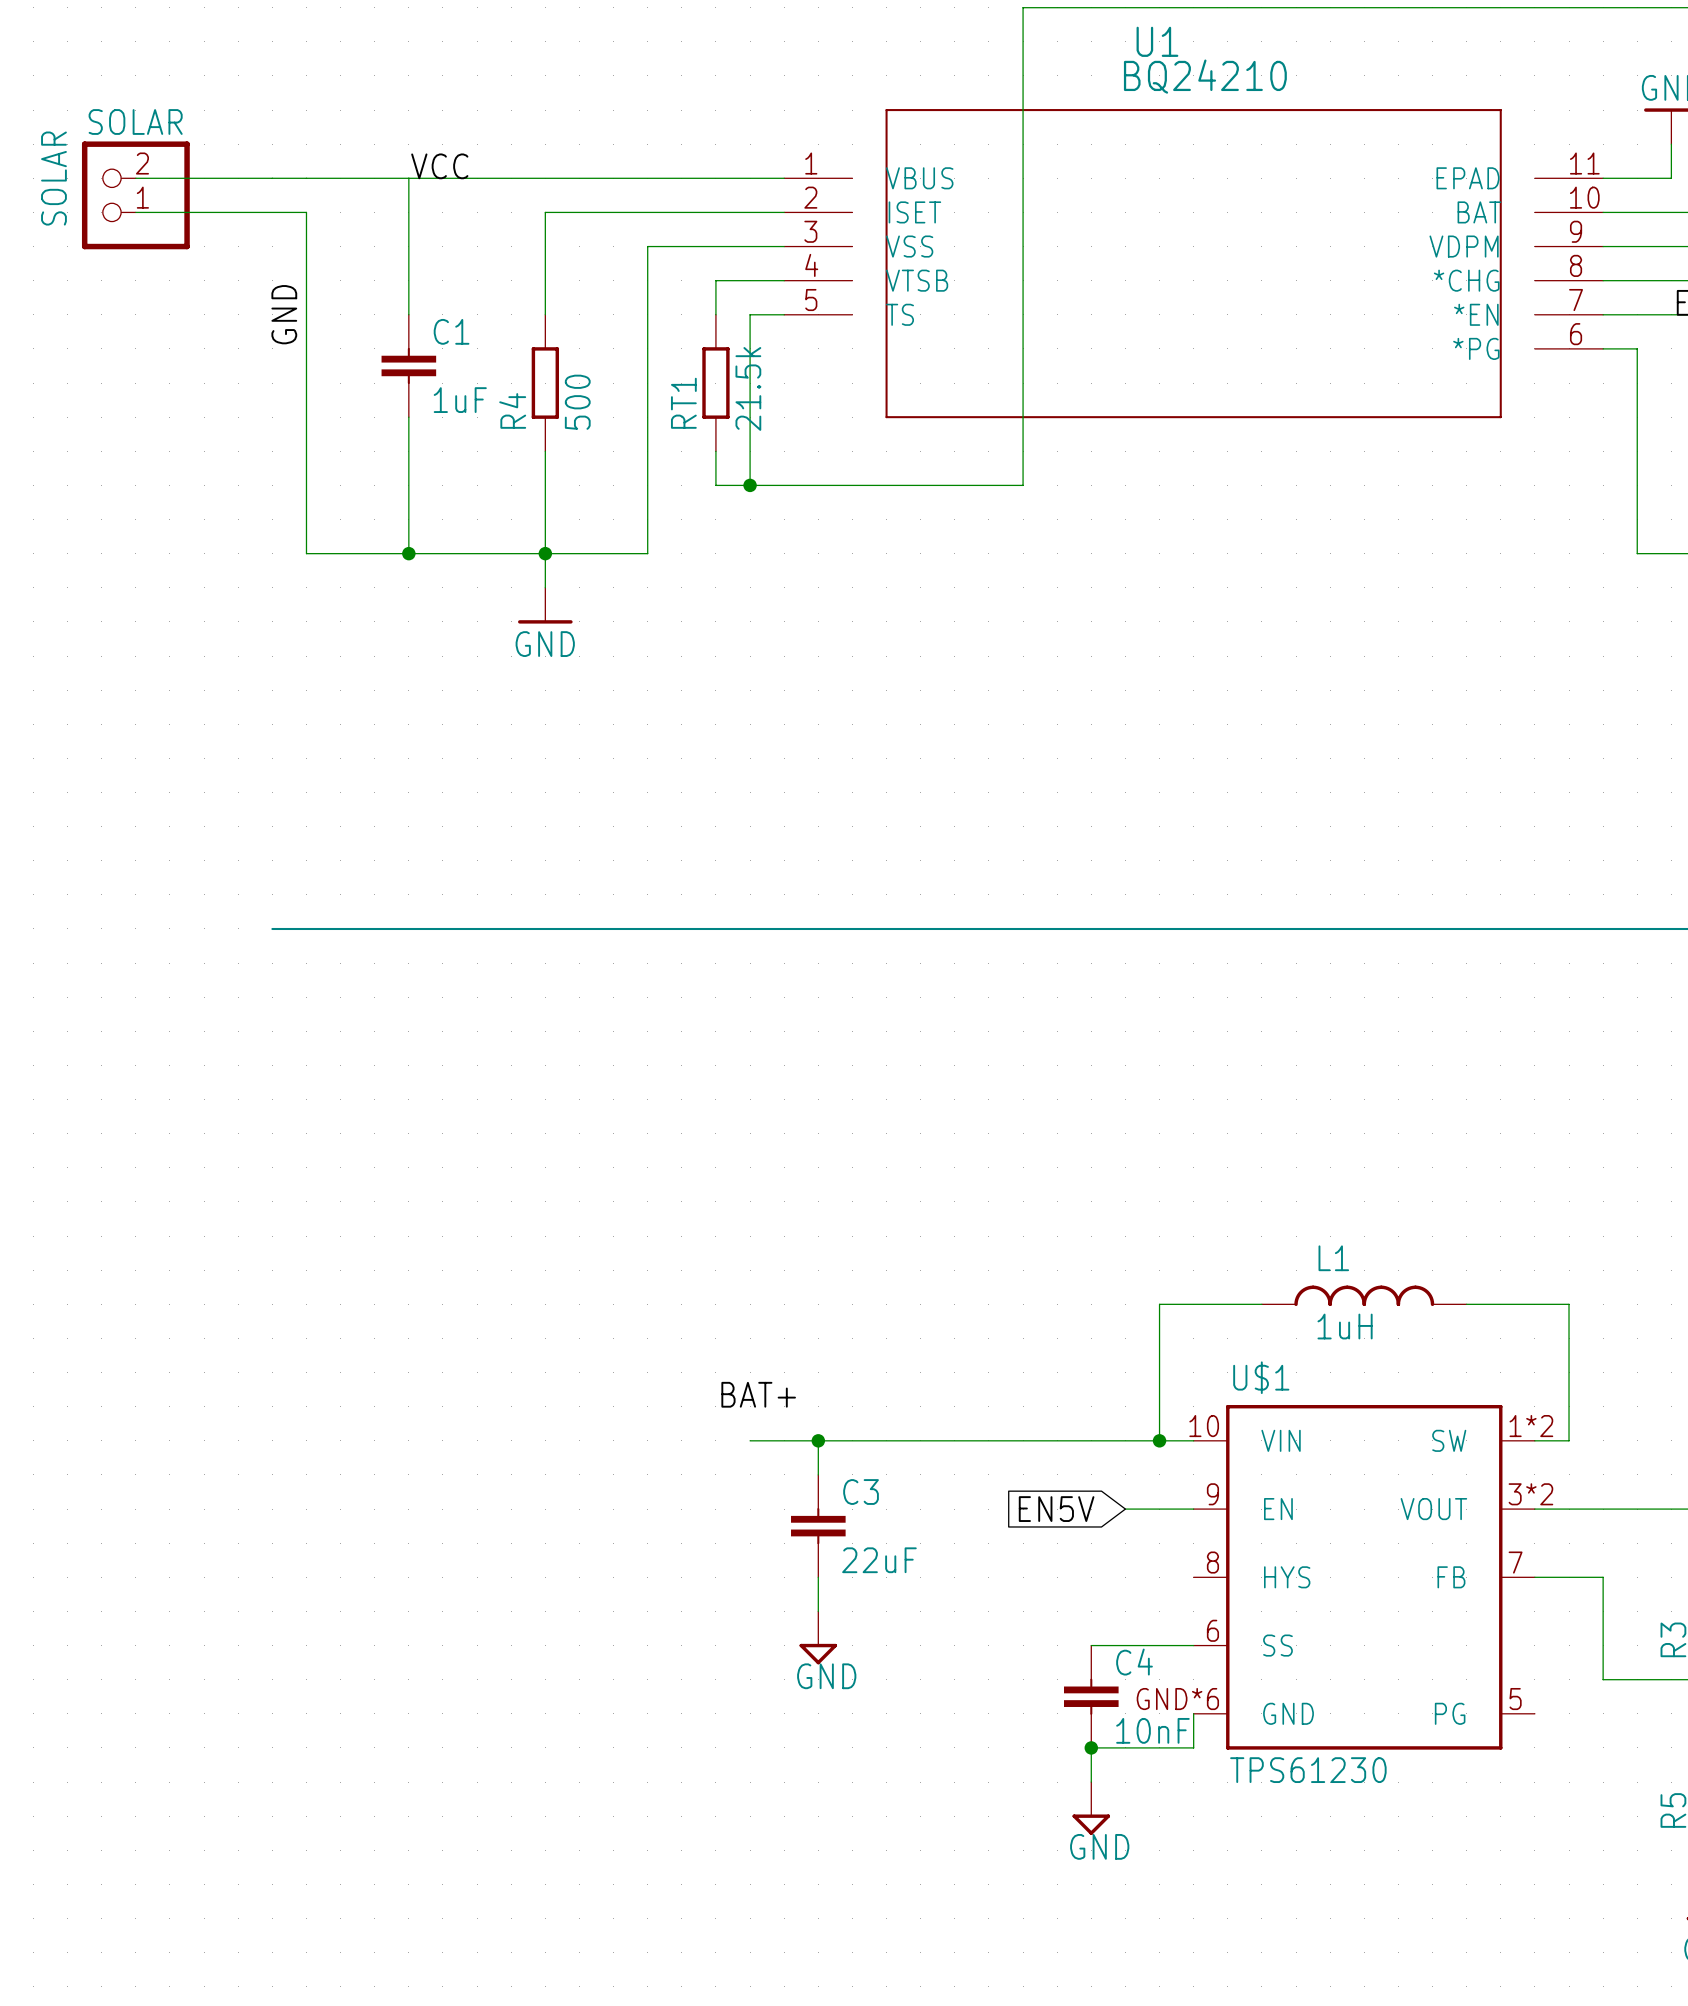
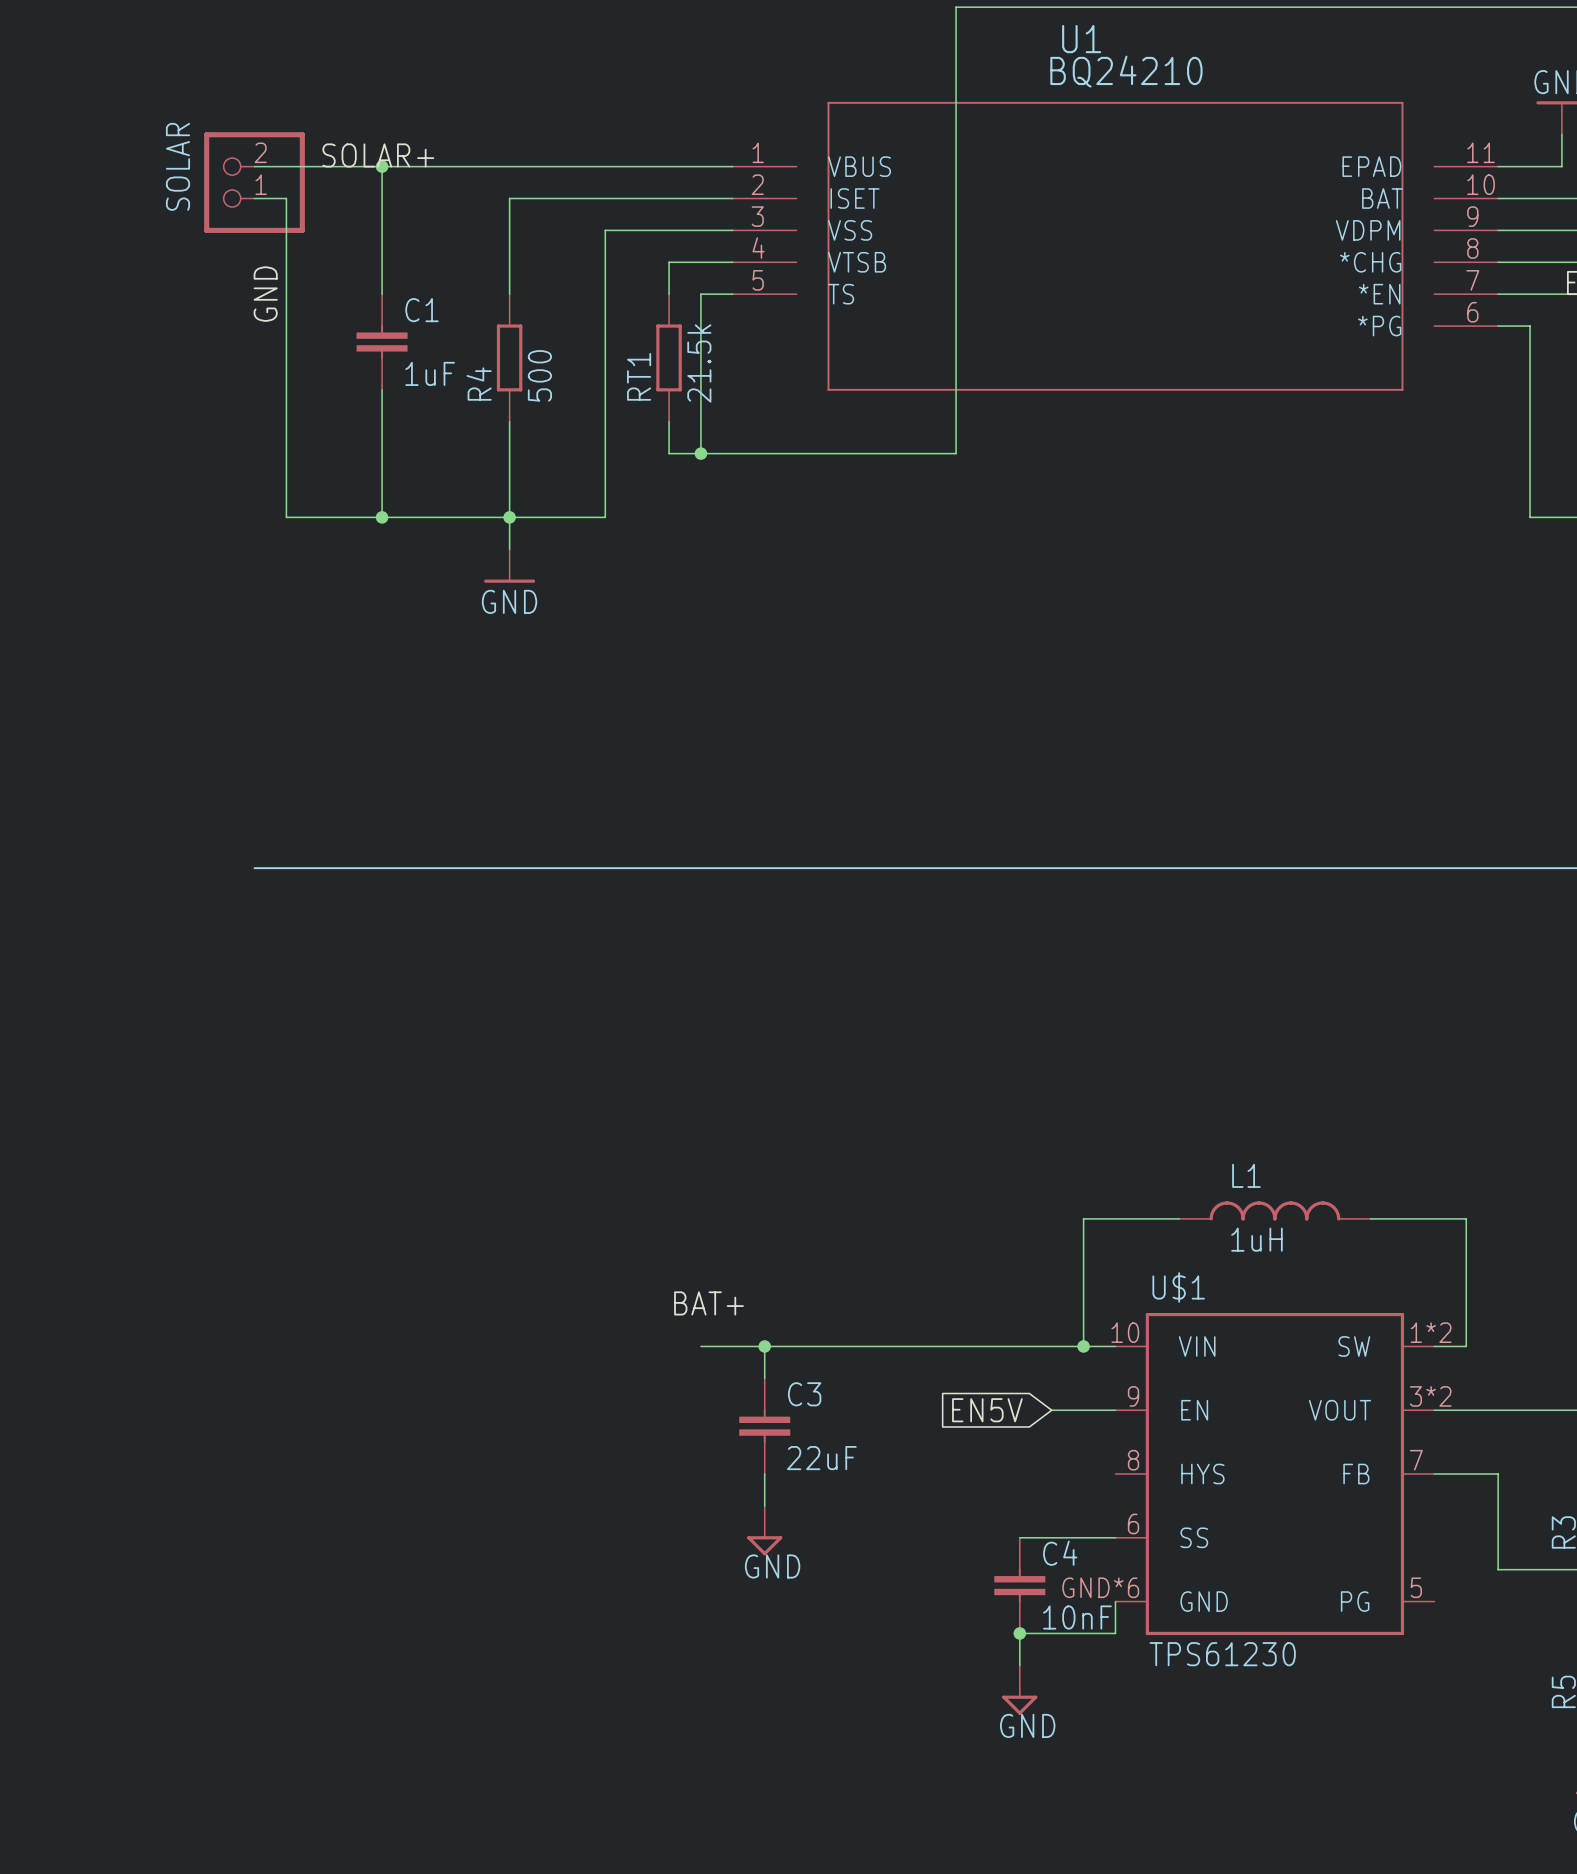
label: none -> SOLAR+ (378, 155)
label: VCC (439, 166) -> none
wire: (135, 178) (272, 178) -> none
junction: none -> (382, 166)
SOLAR: SOLAR (135, 195) -> none
SOLAR: none -> (254, 182)
wire: (135, 212) (272, 212) -> none

